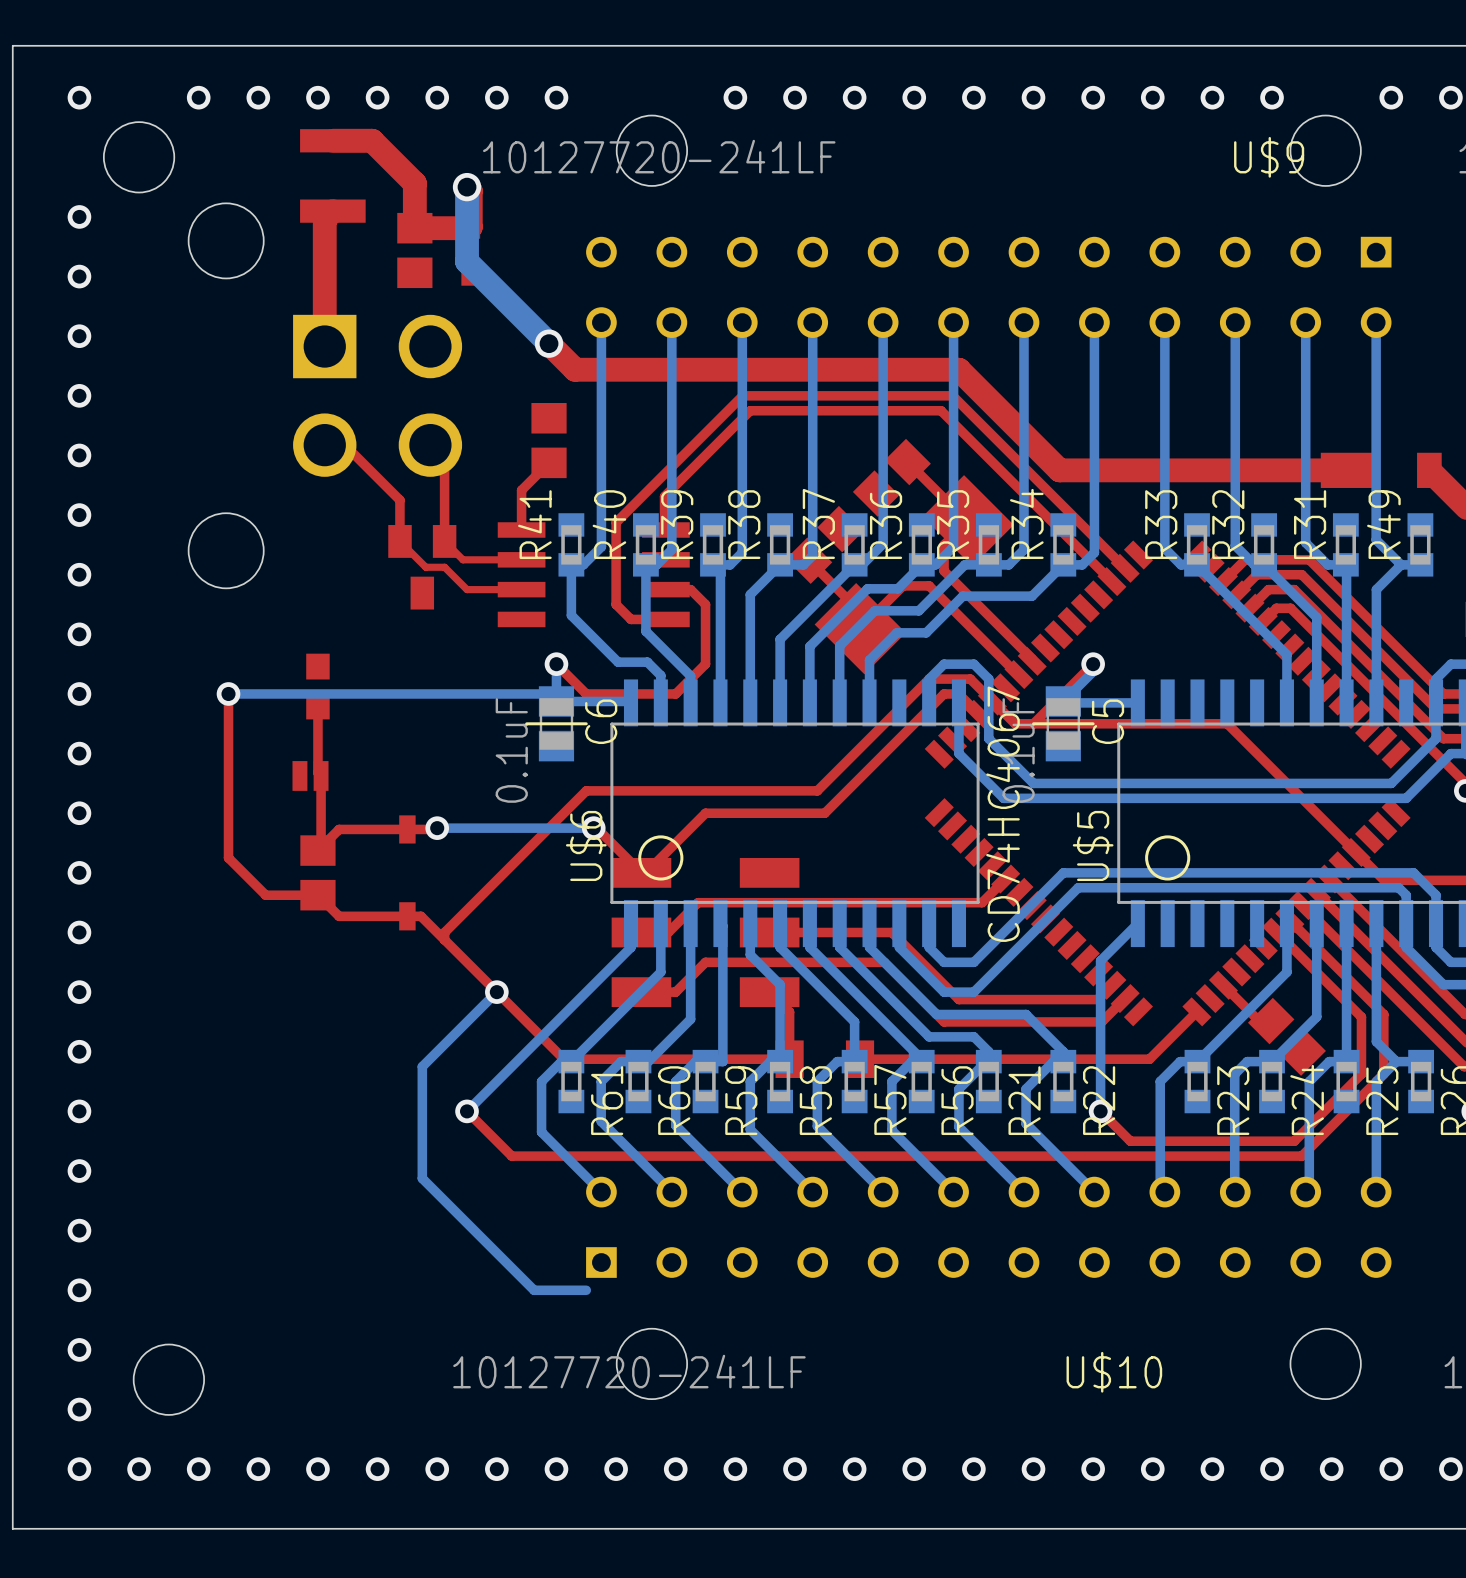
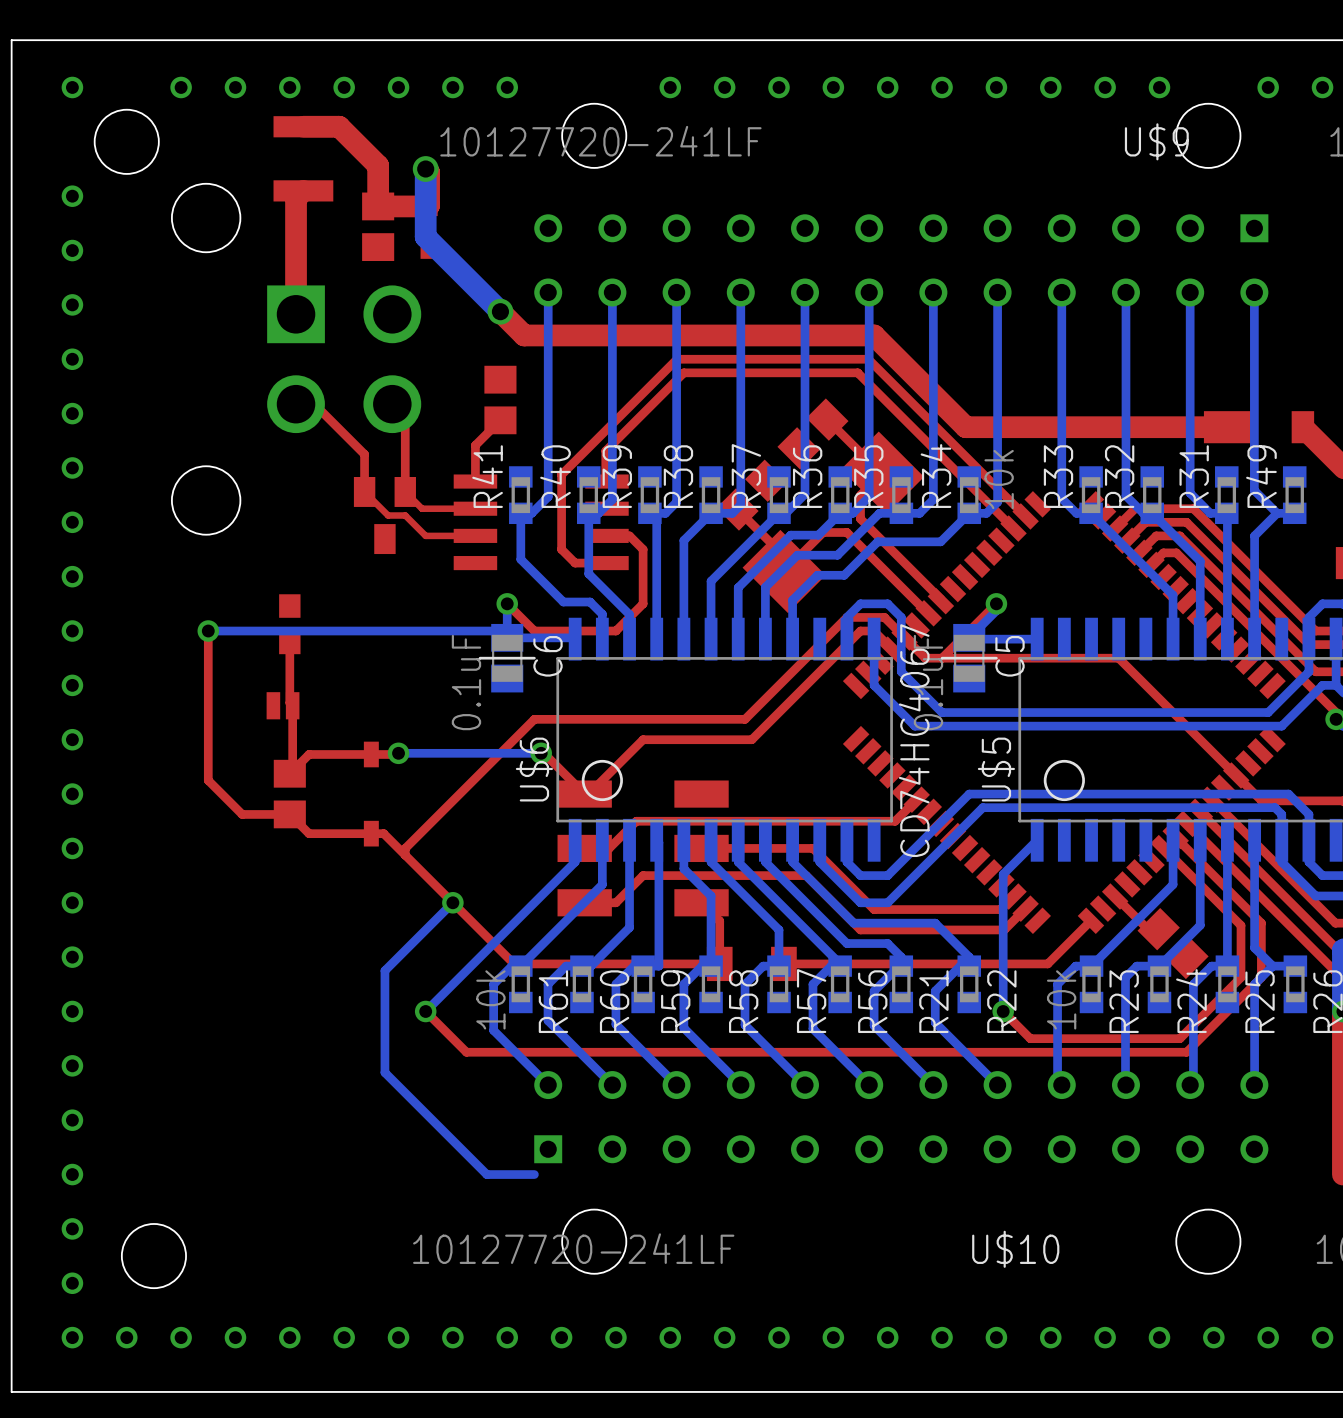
R34 value: none -> 10k (999, 479)
R61 value: none -> 10k (490, 999)
R23 value: none -> 10k (1061, 999)

